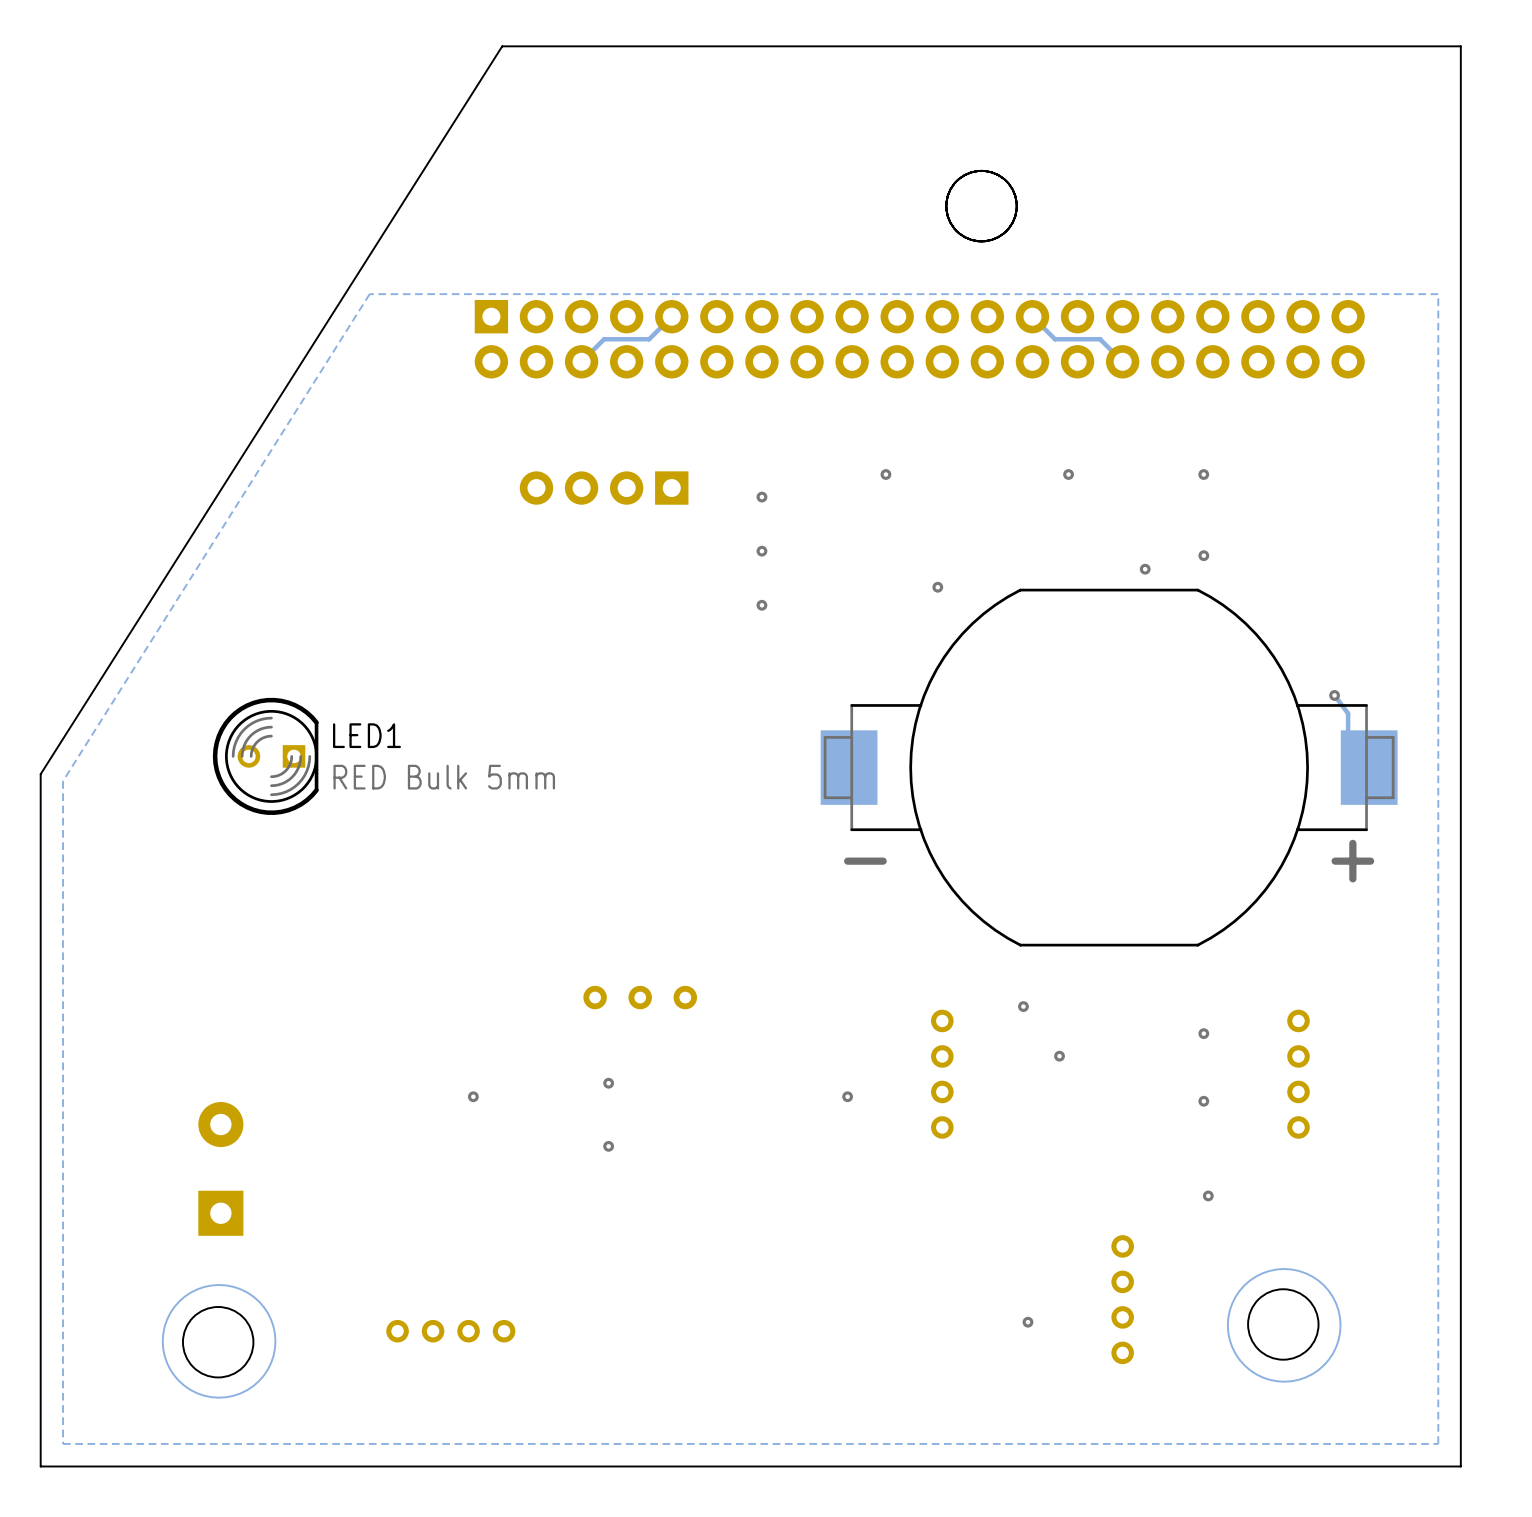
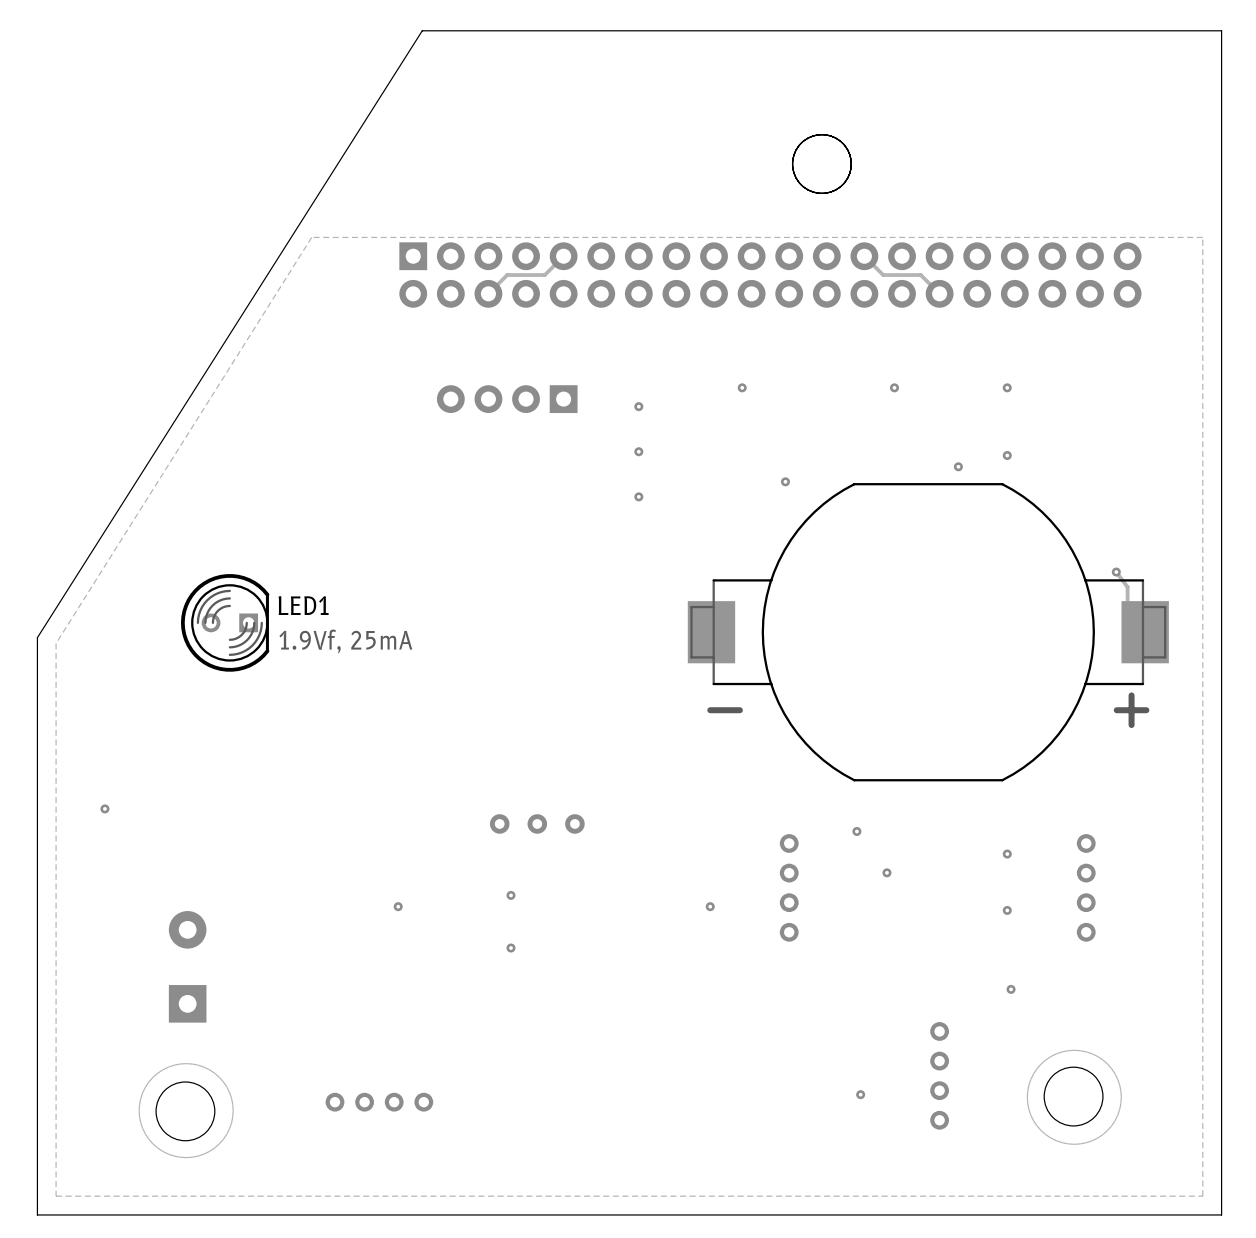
LED1 value: RED Bulk 5mm (444, 777) -> 1.9Vf, 25mA (345, 641)
via: none -> (104, 808)

